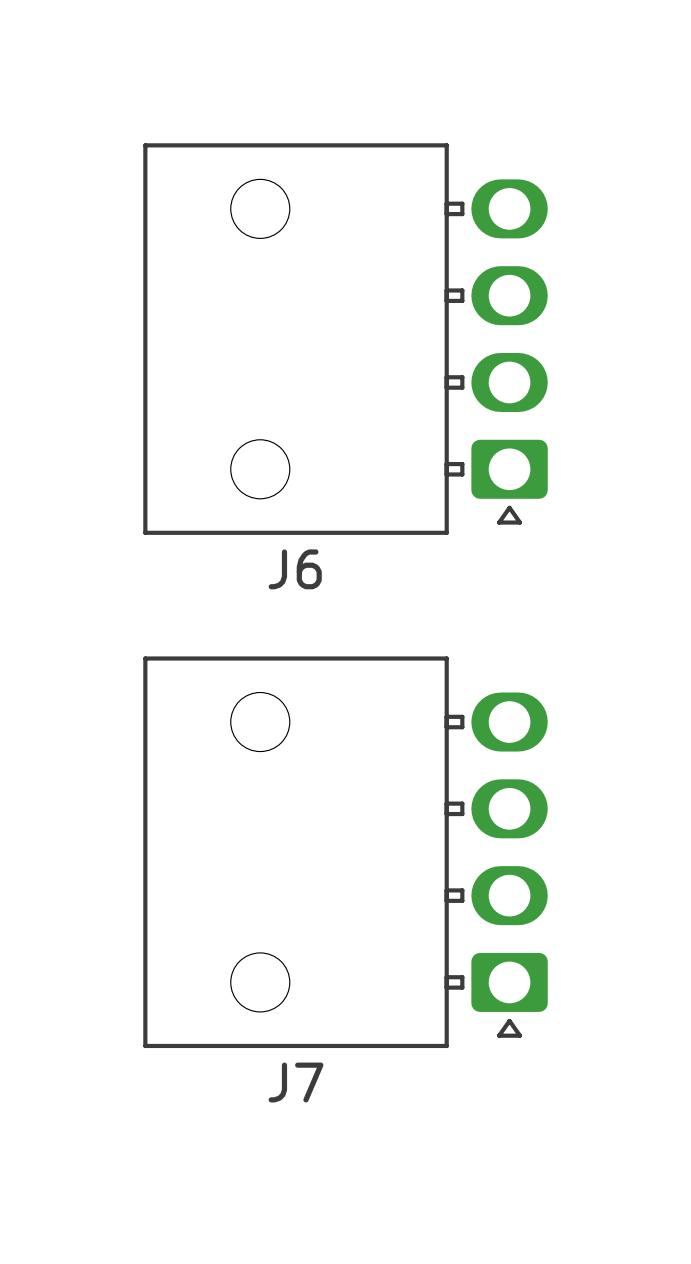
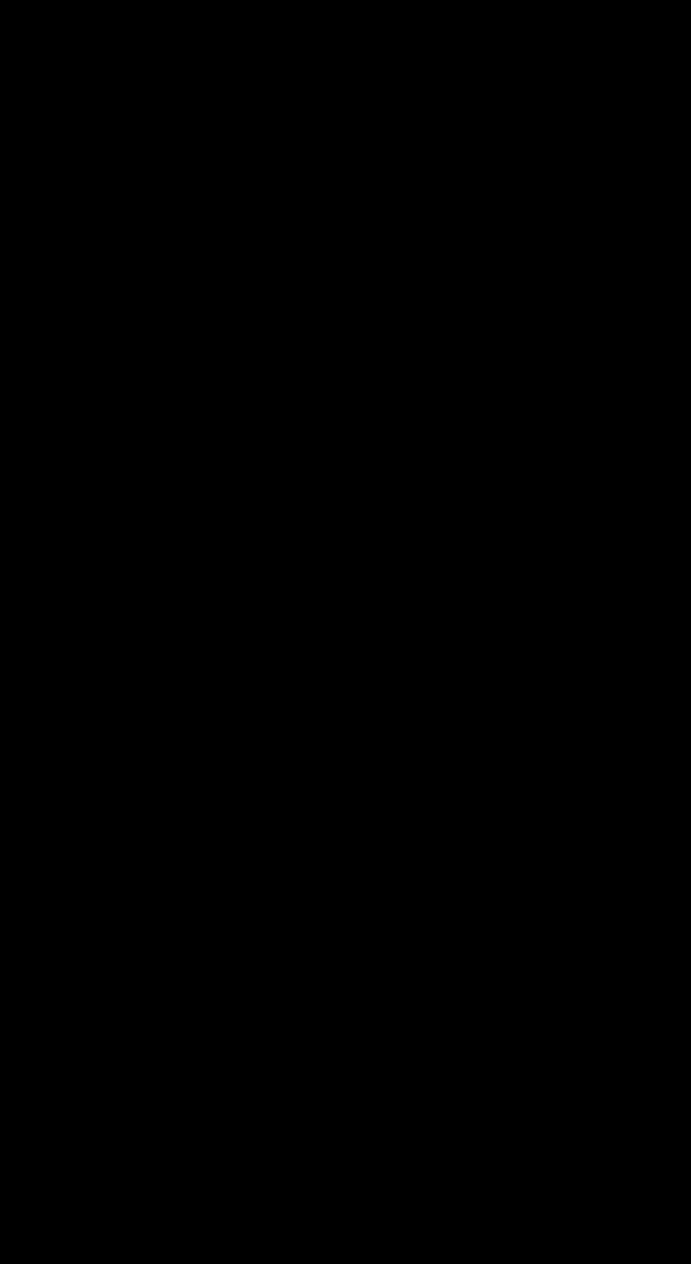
J6: (345, 339) -> none
J7: (345, 852) -> none

